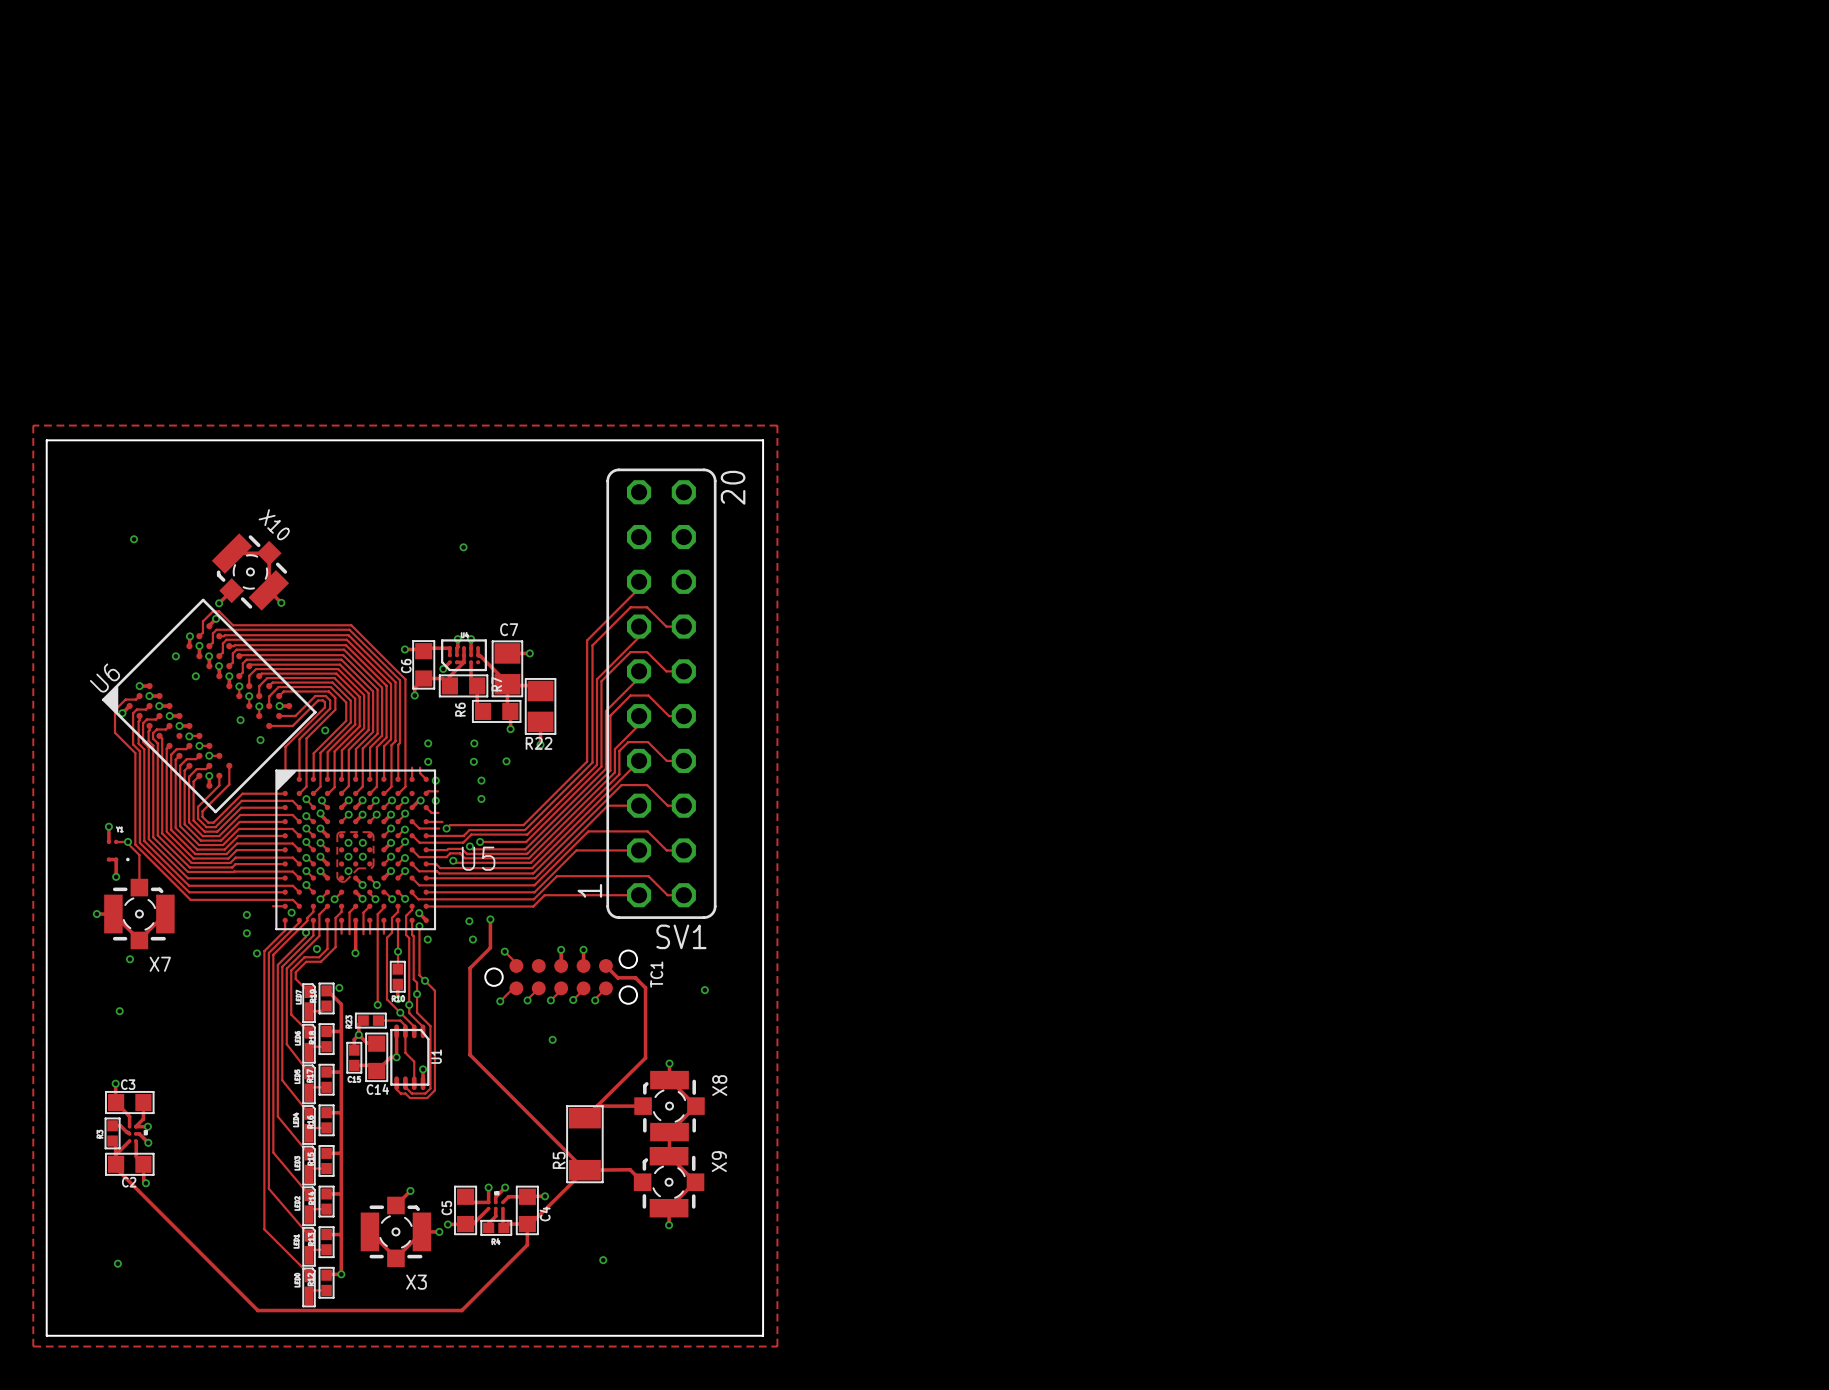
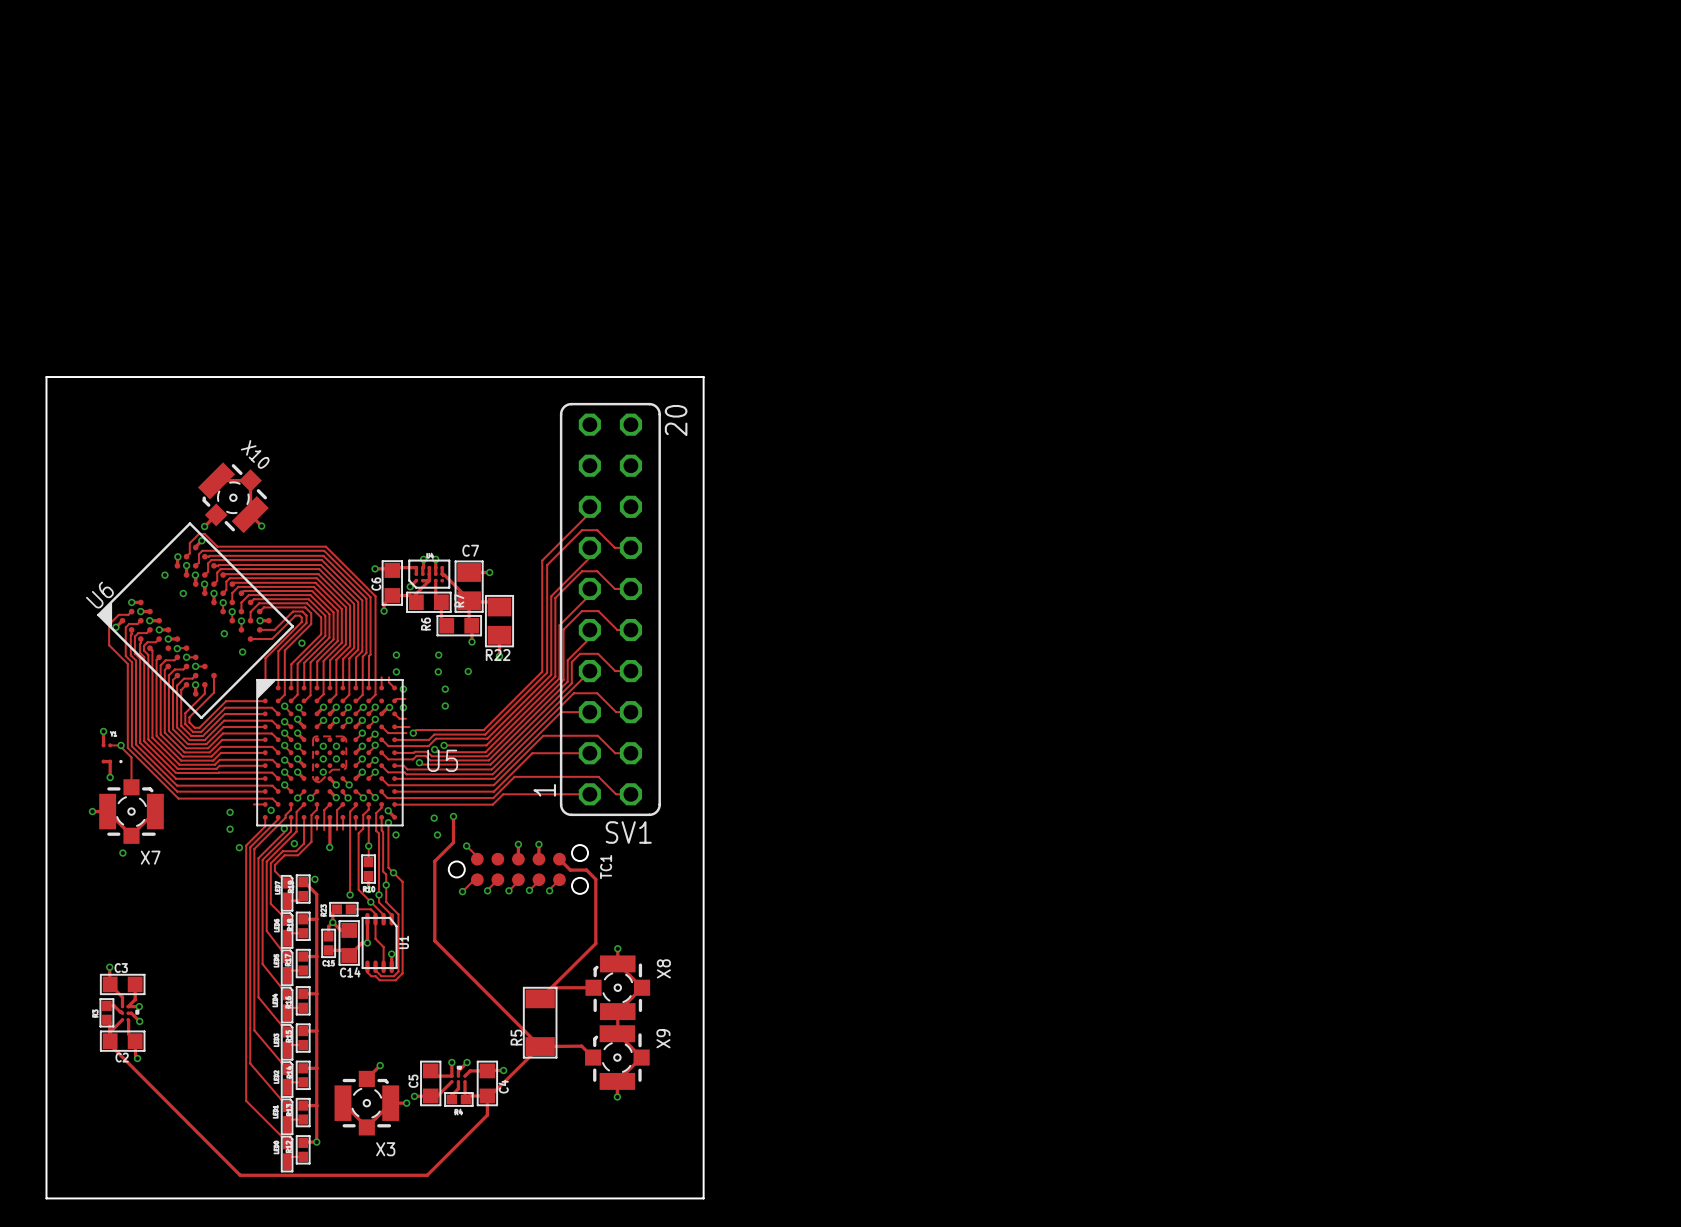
zone outline: (33, 425) (33, 1346) (777, 1346) (777, 425) (33, 425) -> none
via: (134, 539) -> none
via: (463, 547) -> none
via: (704, 990) -> none
via: (119, 1011) -> none
via: (552, 1039) -> none
via: (603, 1260) -> none
via: (117, 1263) -> none

